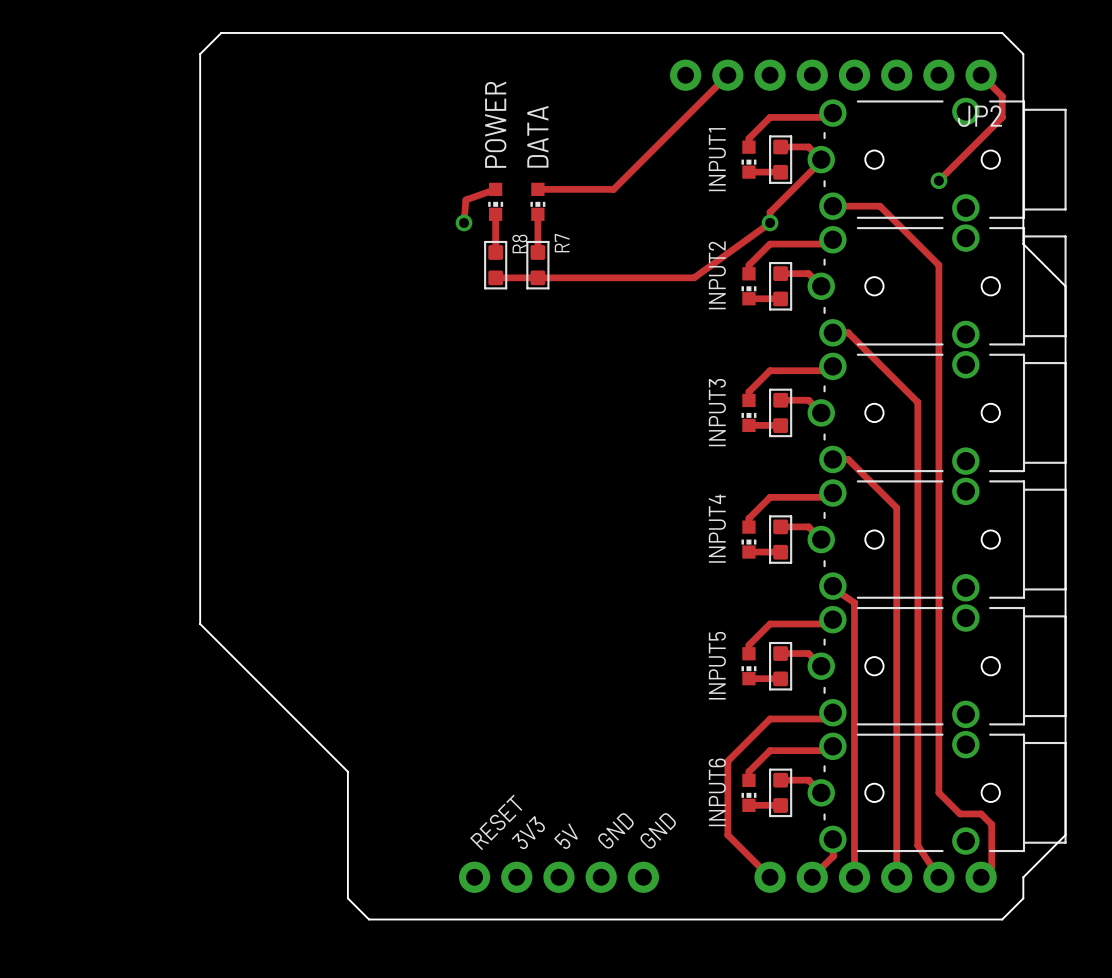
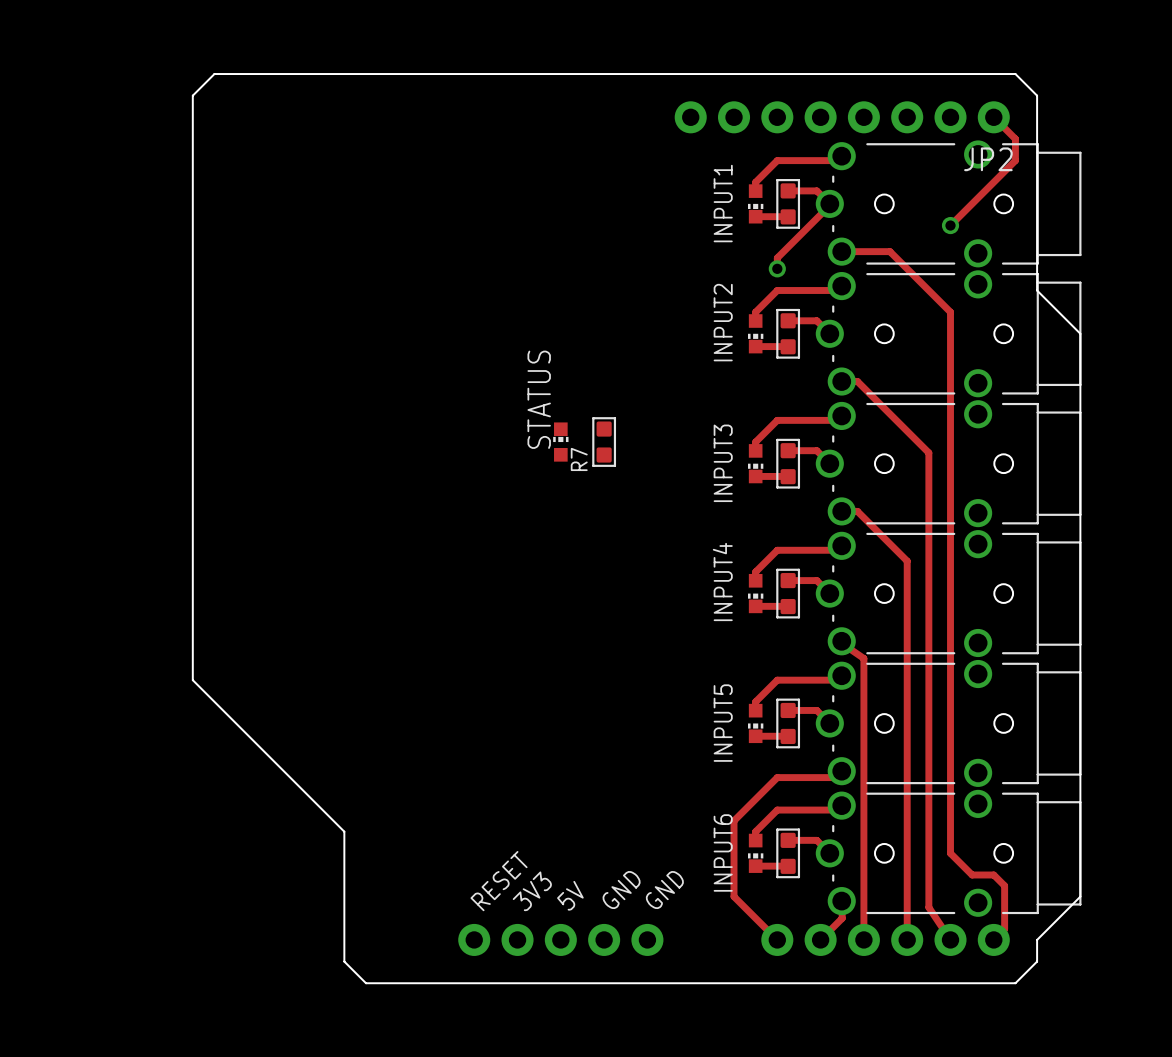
track: (727, 75) (613, 189) (537, 189) -> none
track: (495, 189) (465, 199) (464, 222) -> none
POWER: (495, 201) -> none
DATA: (537, 201) -> none
track: (495, 214) (495, 252) -> none
track: (537, 214) (537, 252) -> none
via: (464, 222) -> none
track: (770, 222) (694, 277) (495, 277) -> none
R7 name position: R7 (562, 243) -> R7 (579, 459)
R8: (495, 265) -> none
R7 position: (537, 265) -> (604, 442)
STATUS: none -> (560, 442)

